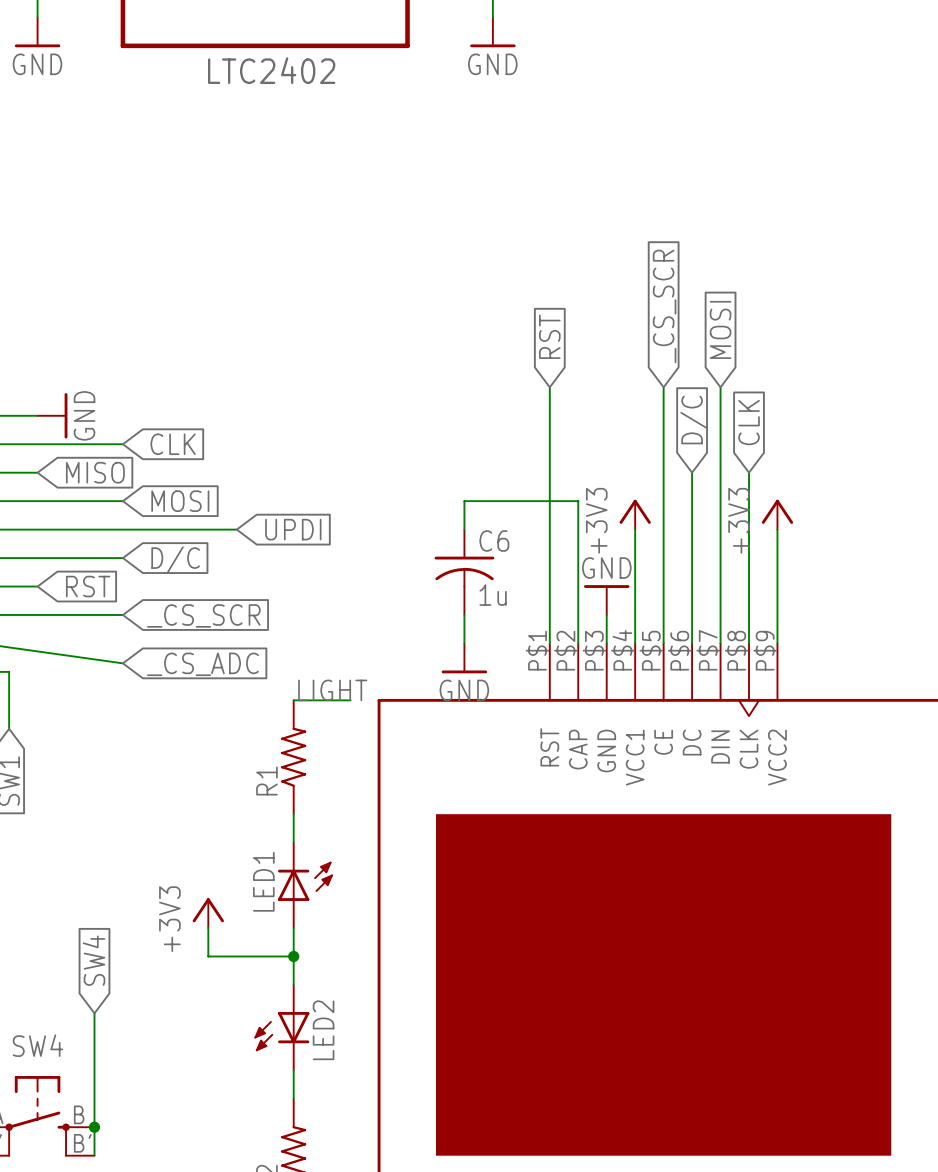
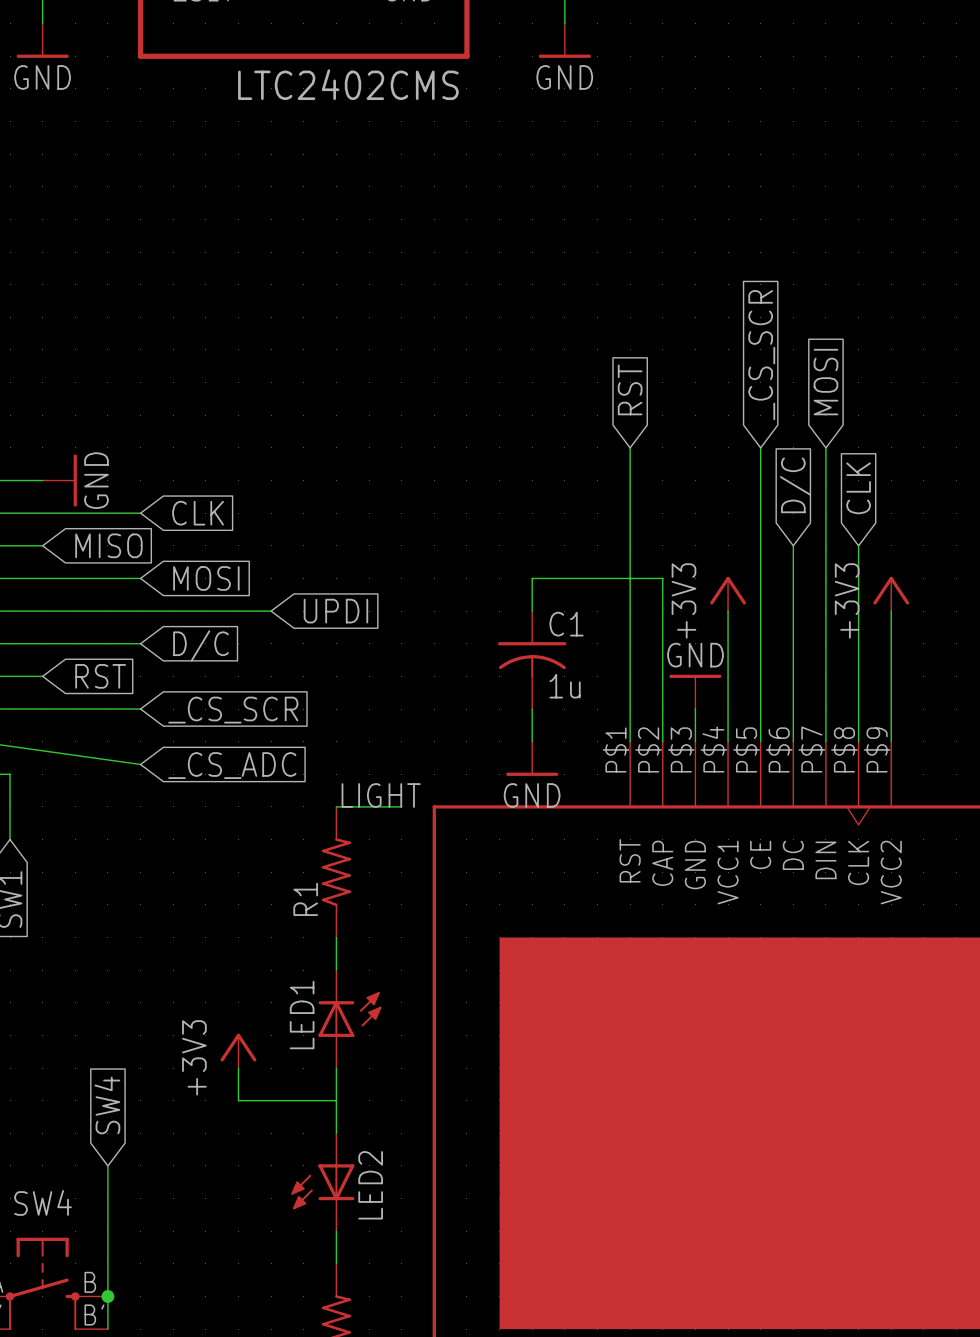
part value: LTC2402 (271, 70) -> LTC2402CMS (348, 84)
C6 name: C6 (494, 541) -> C1 (566, 624)
junction: (293, 956) -> none

